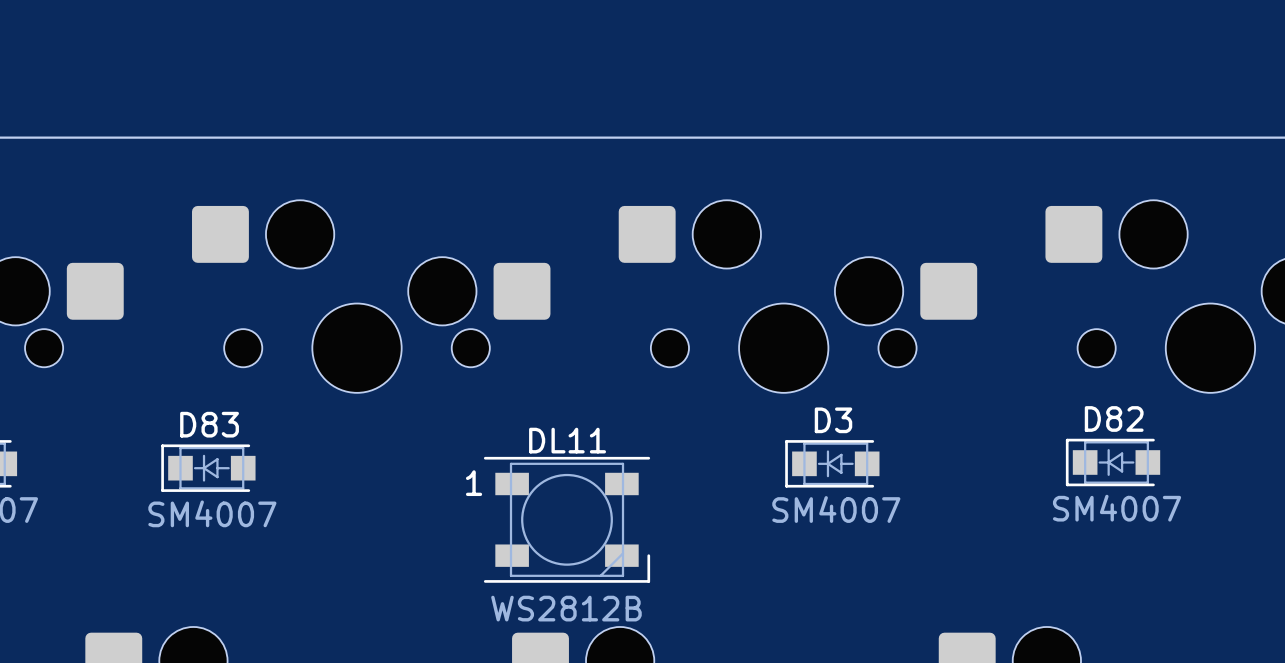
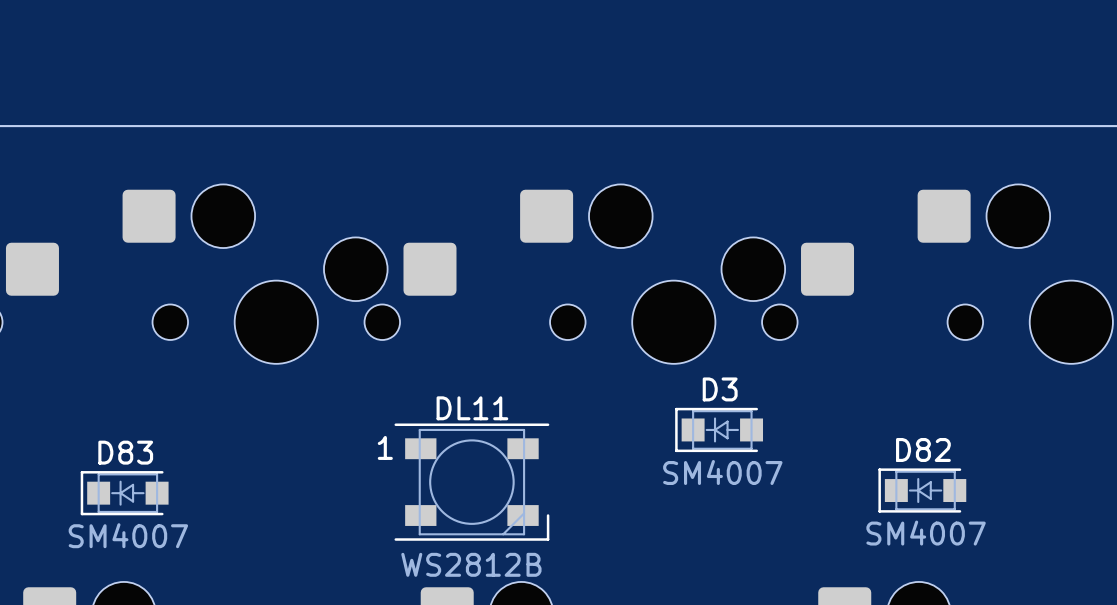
D82 position: (1113, 462) -> (922, 490)
D83 position: (208, 468) -> (124, 493)

